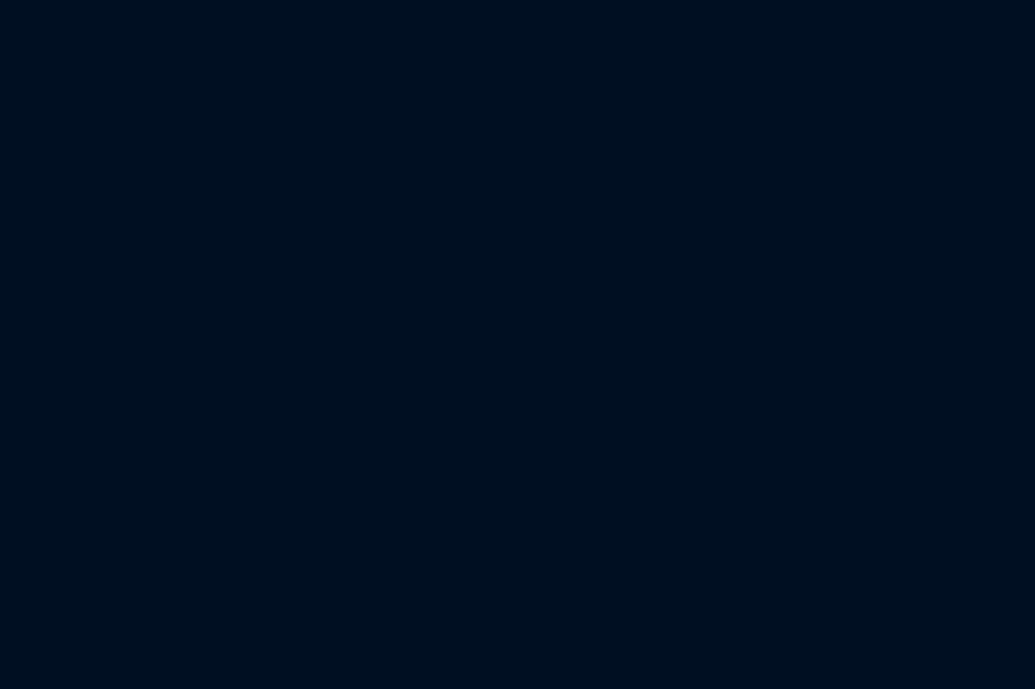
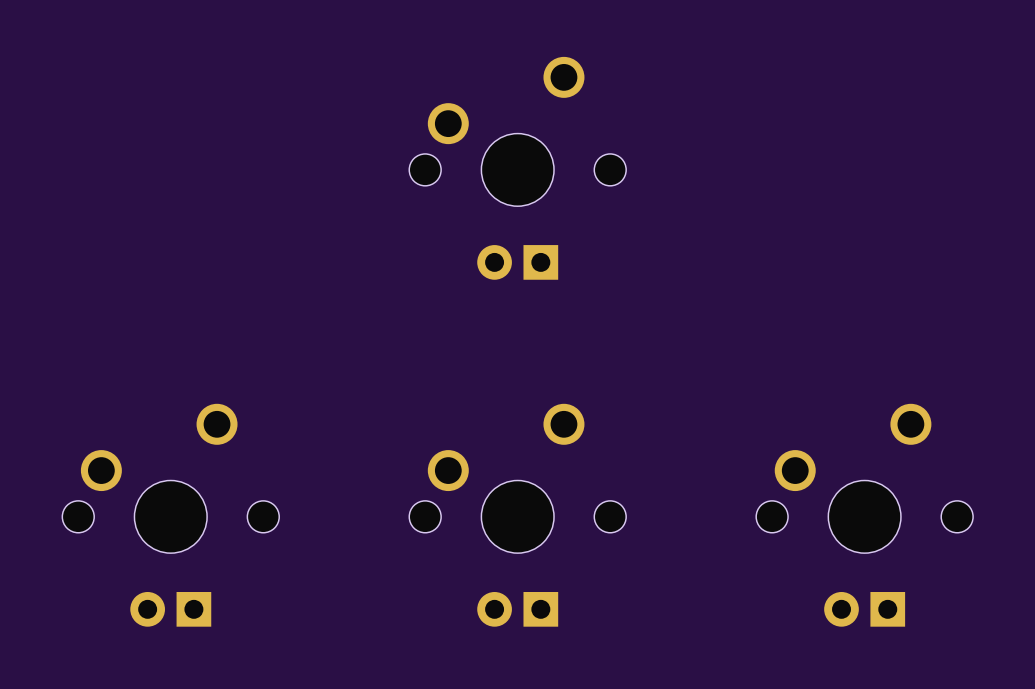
part: none -> (517, 168)
part: none -> (170, 515)
part: none -> (517, 515)
part: none -> (864, 515)

